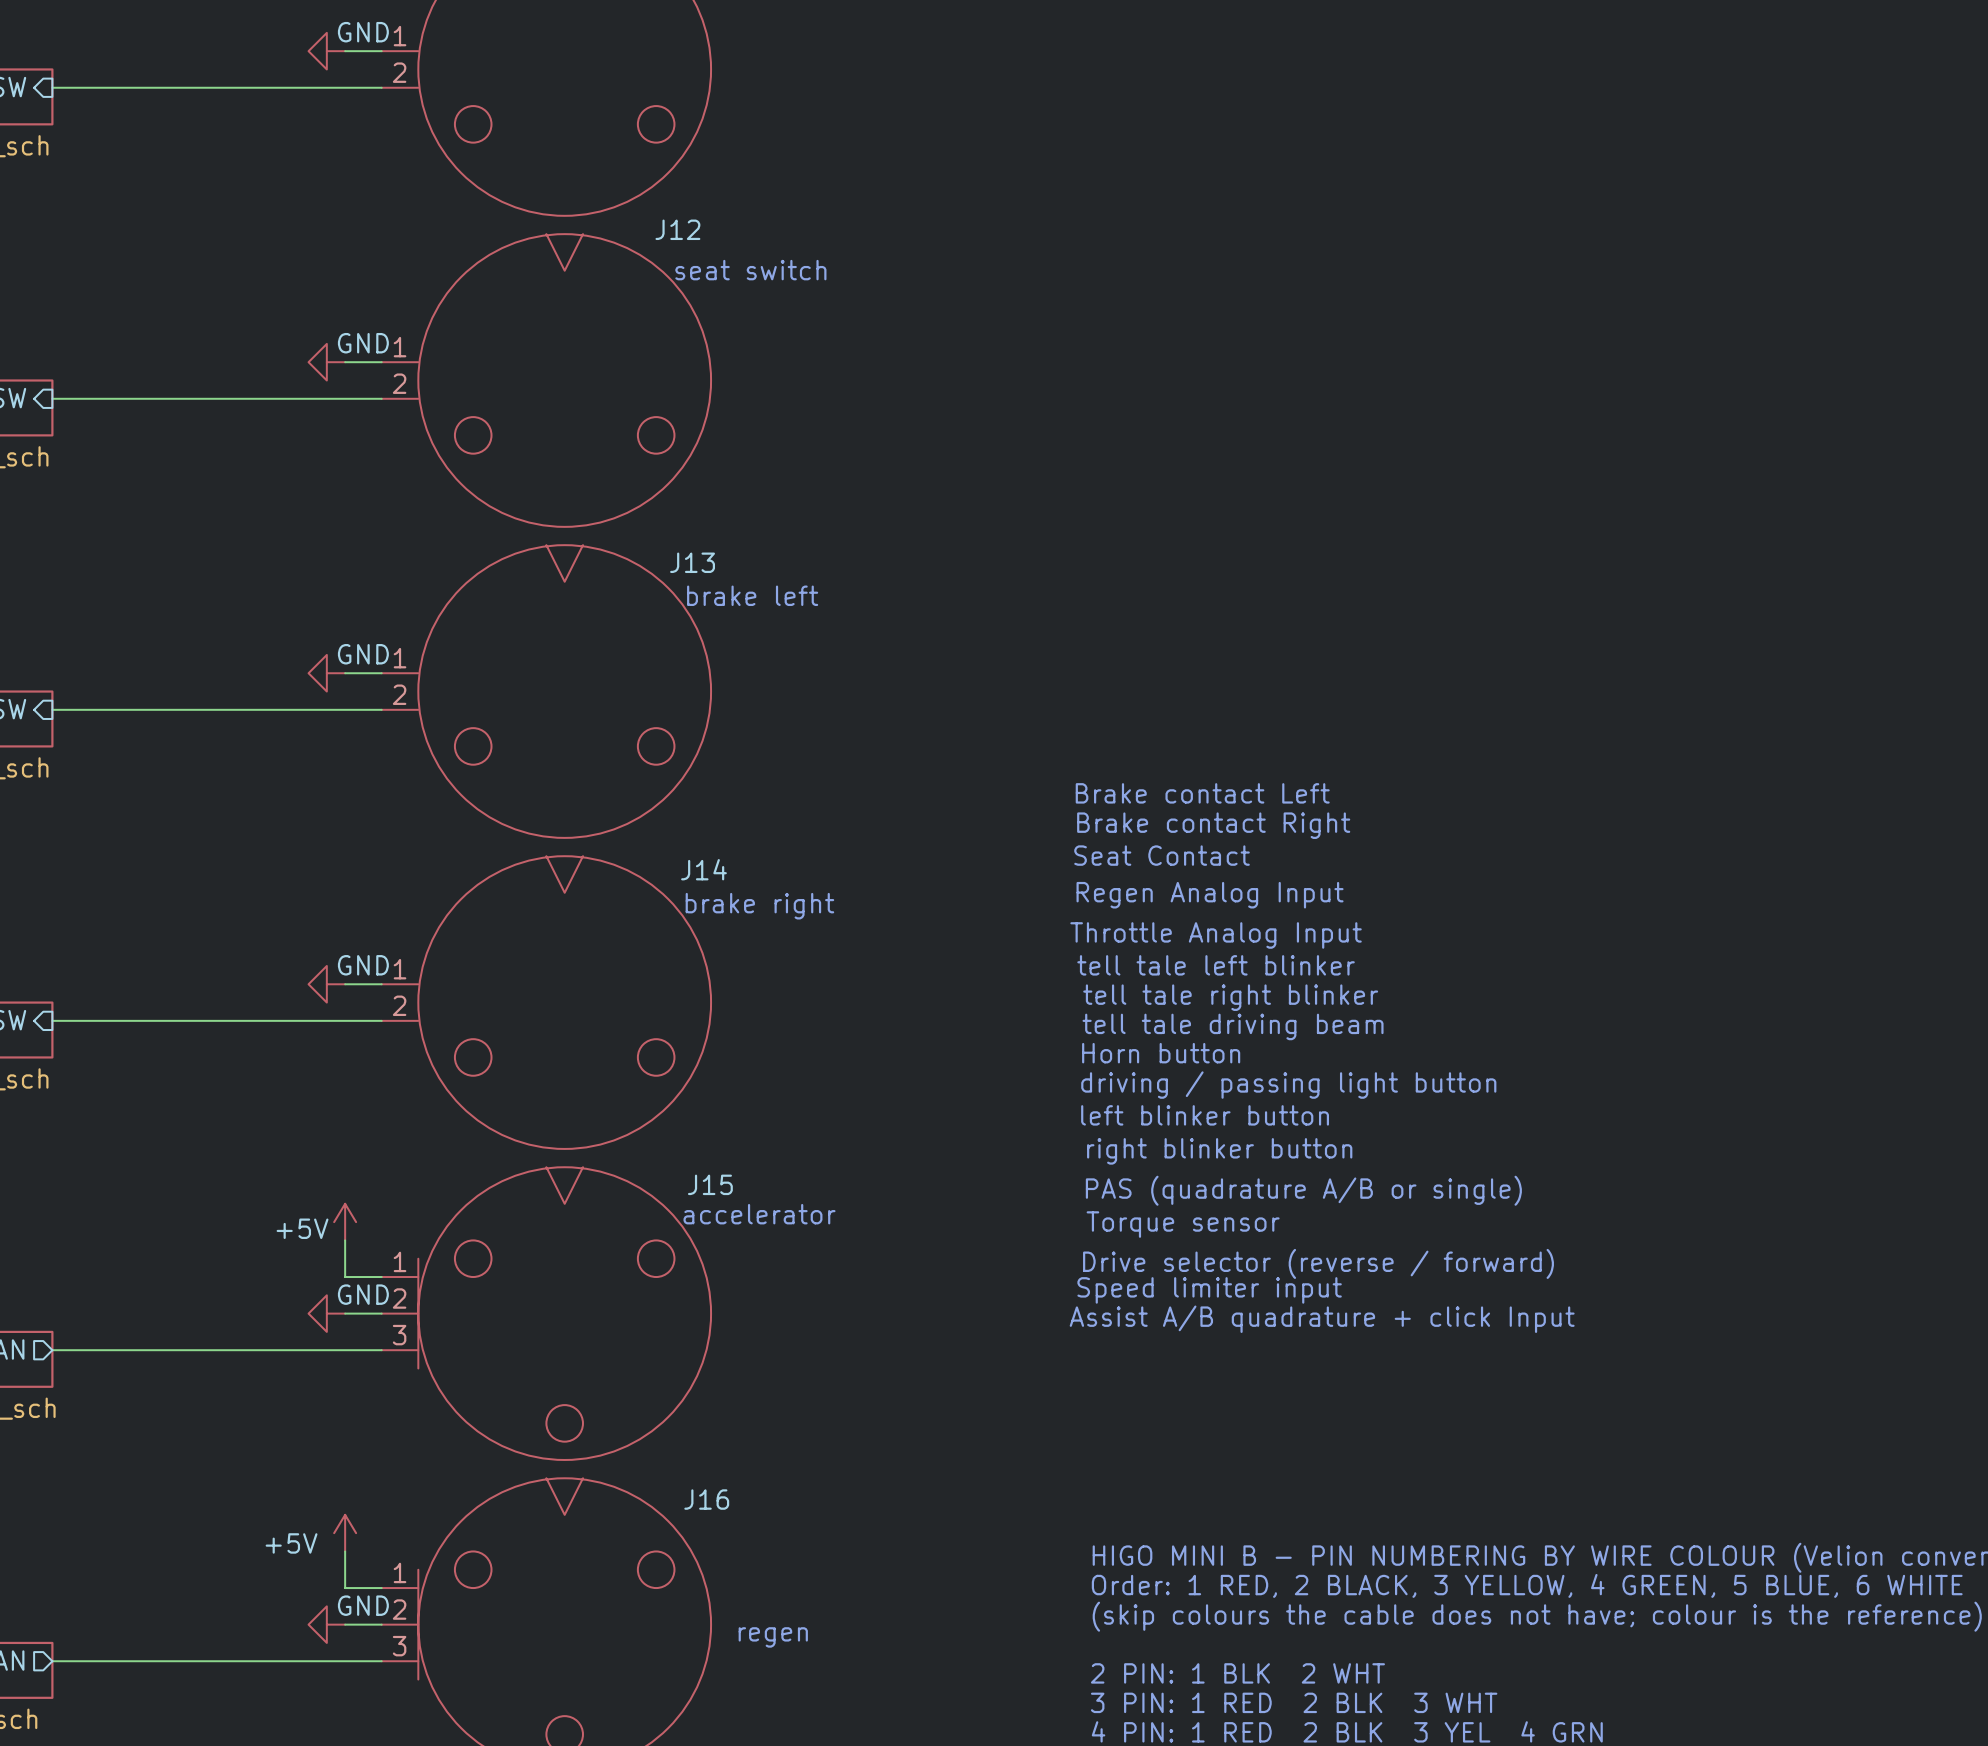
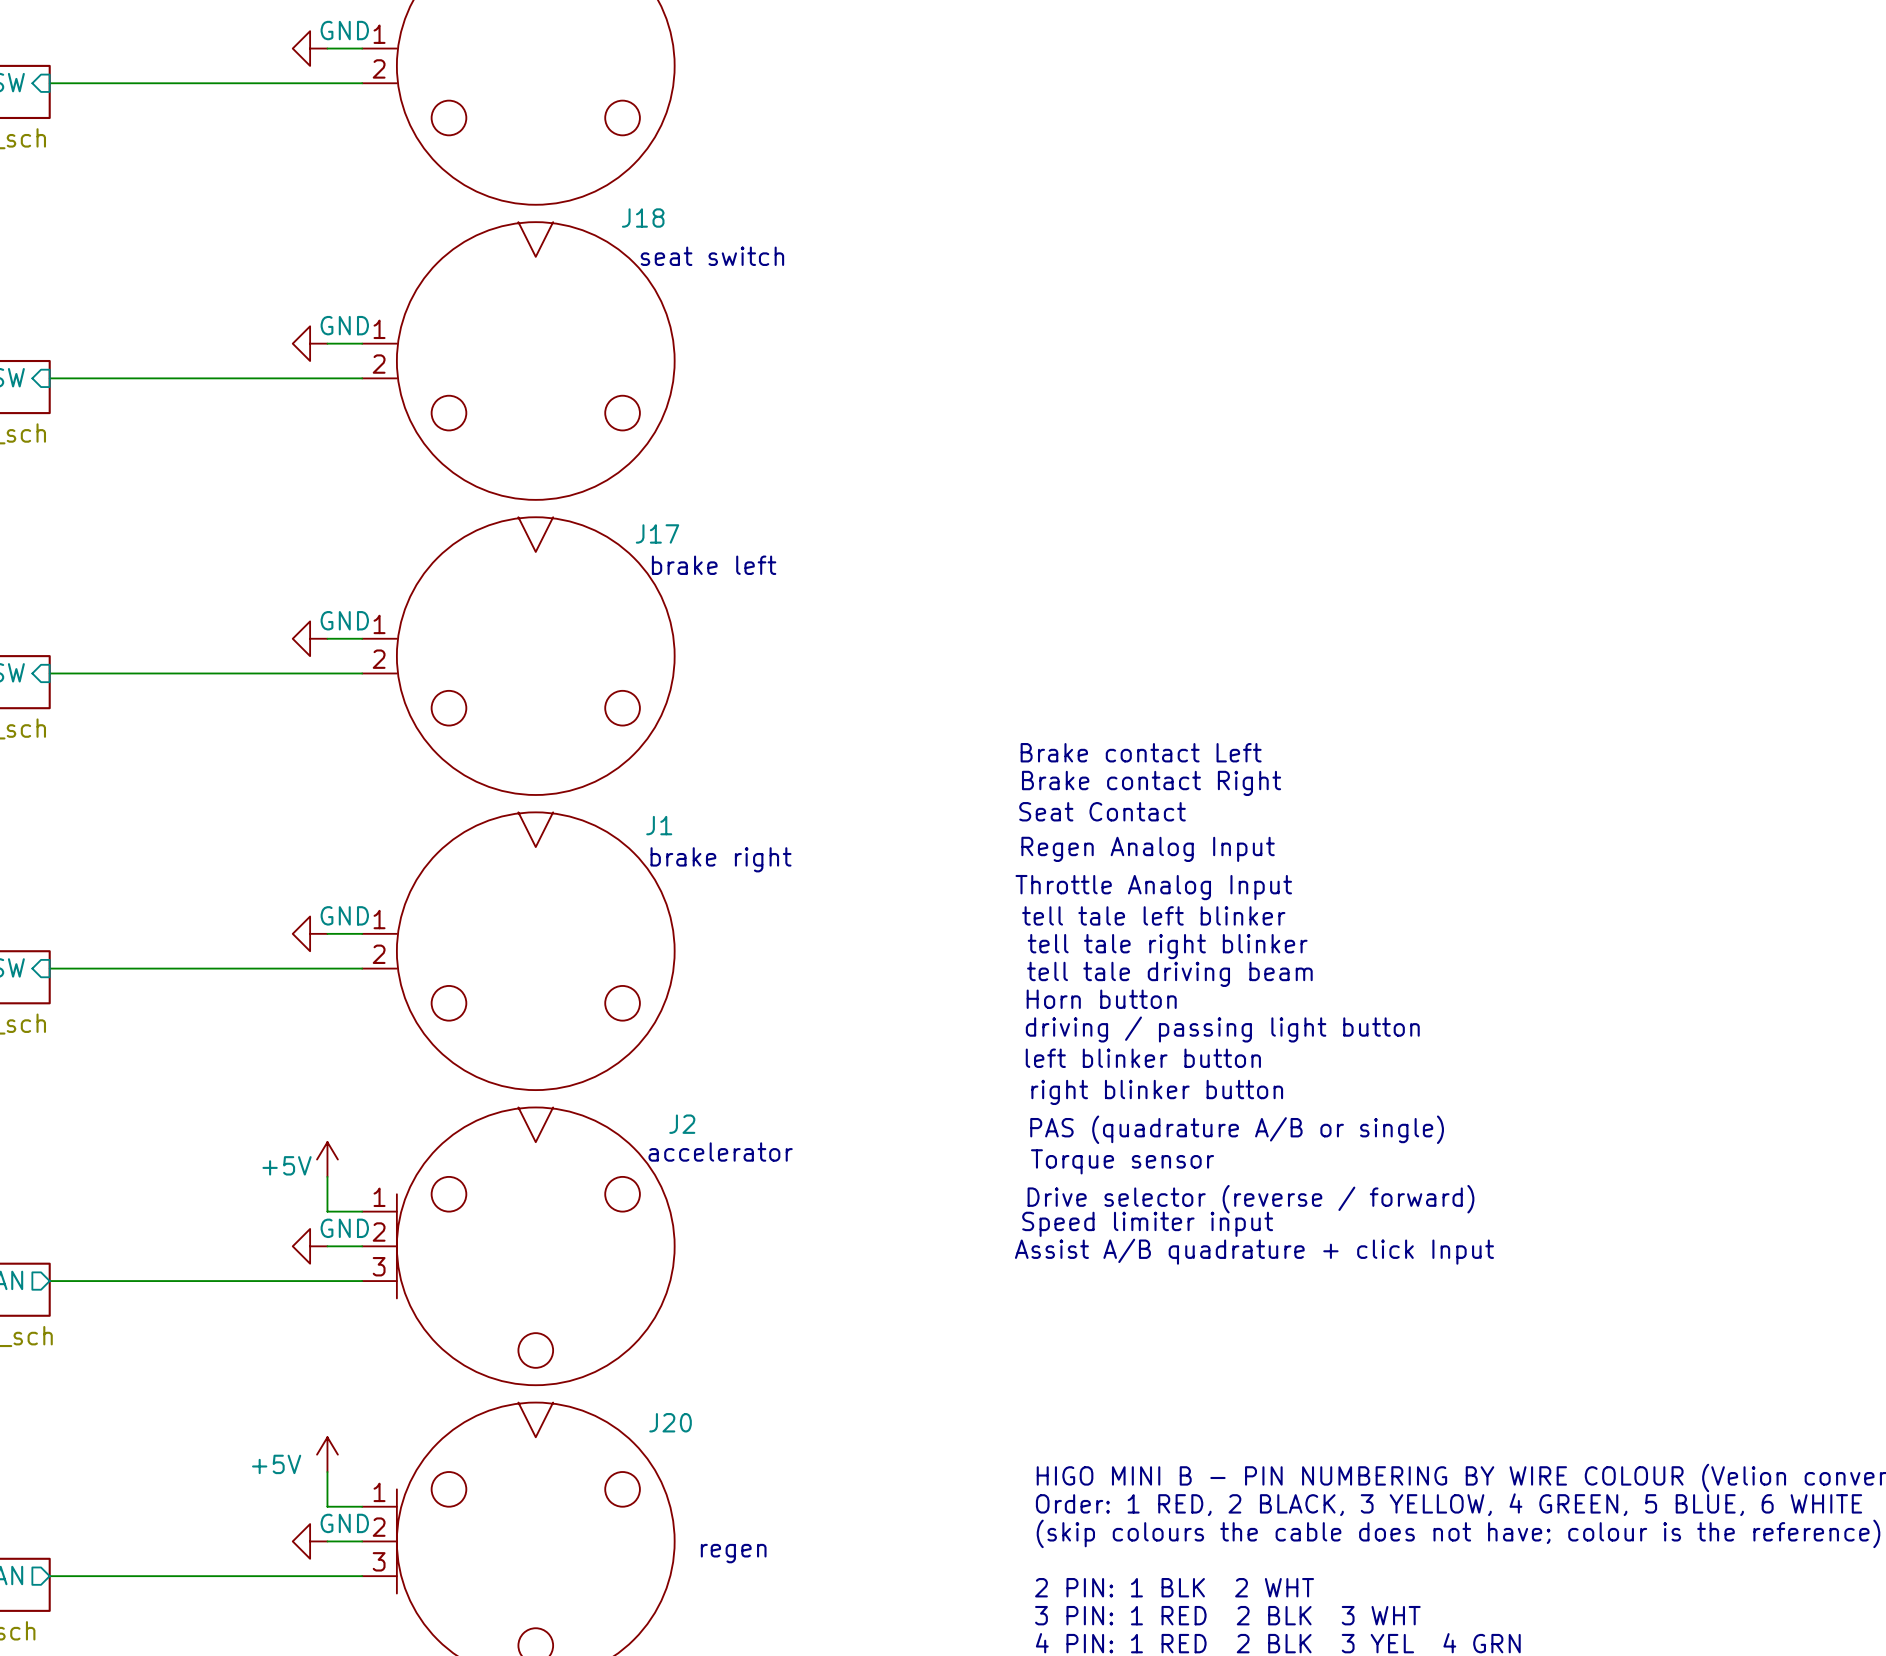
J12 name: J12 (677, 229) -> J18 (643, 218)
J13 name: J13 (692, 562) -> J17 (657, 533)
J14 name: J14 (703, 869) -> J1 (659, 825)
J15 name: J15 (710, 1184) -> J2 (682, 1124)
J16 name: J16 (706, 1499) -> J20 (670, 1422)

